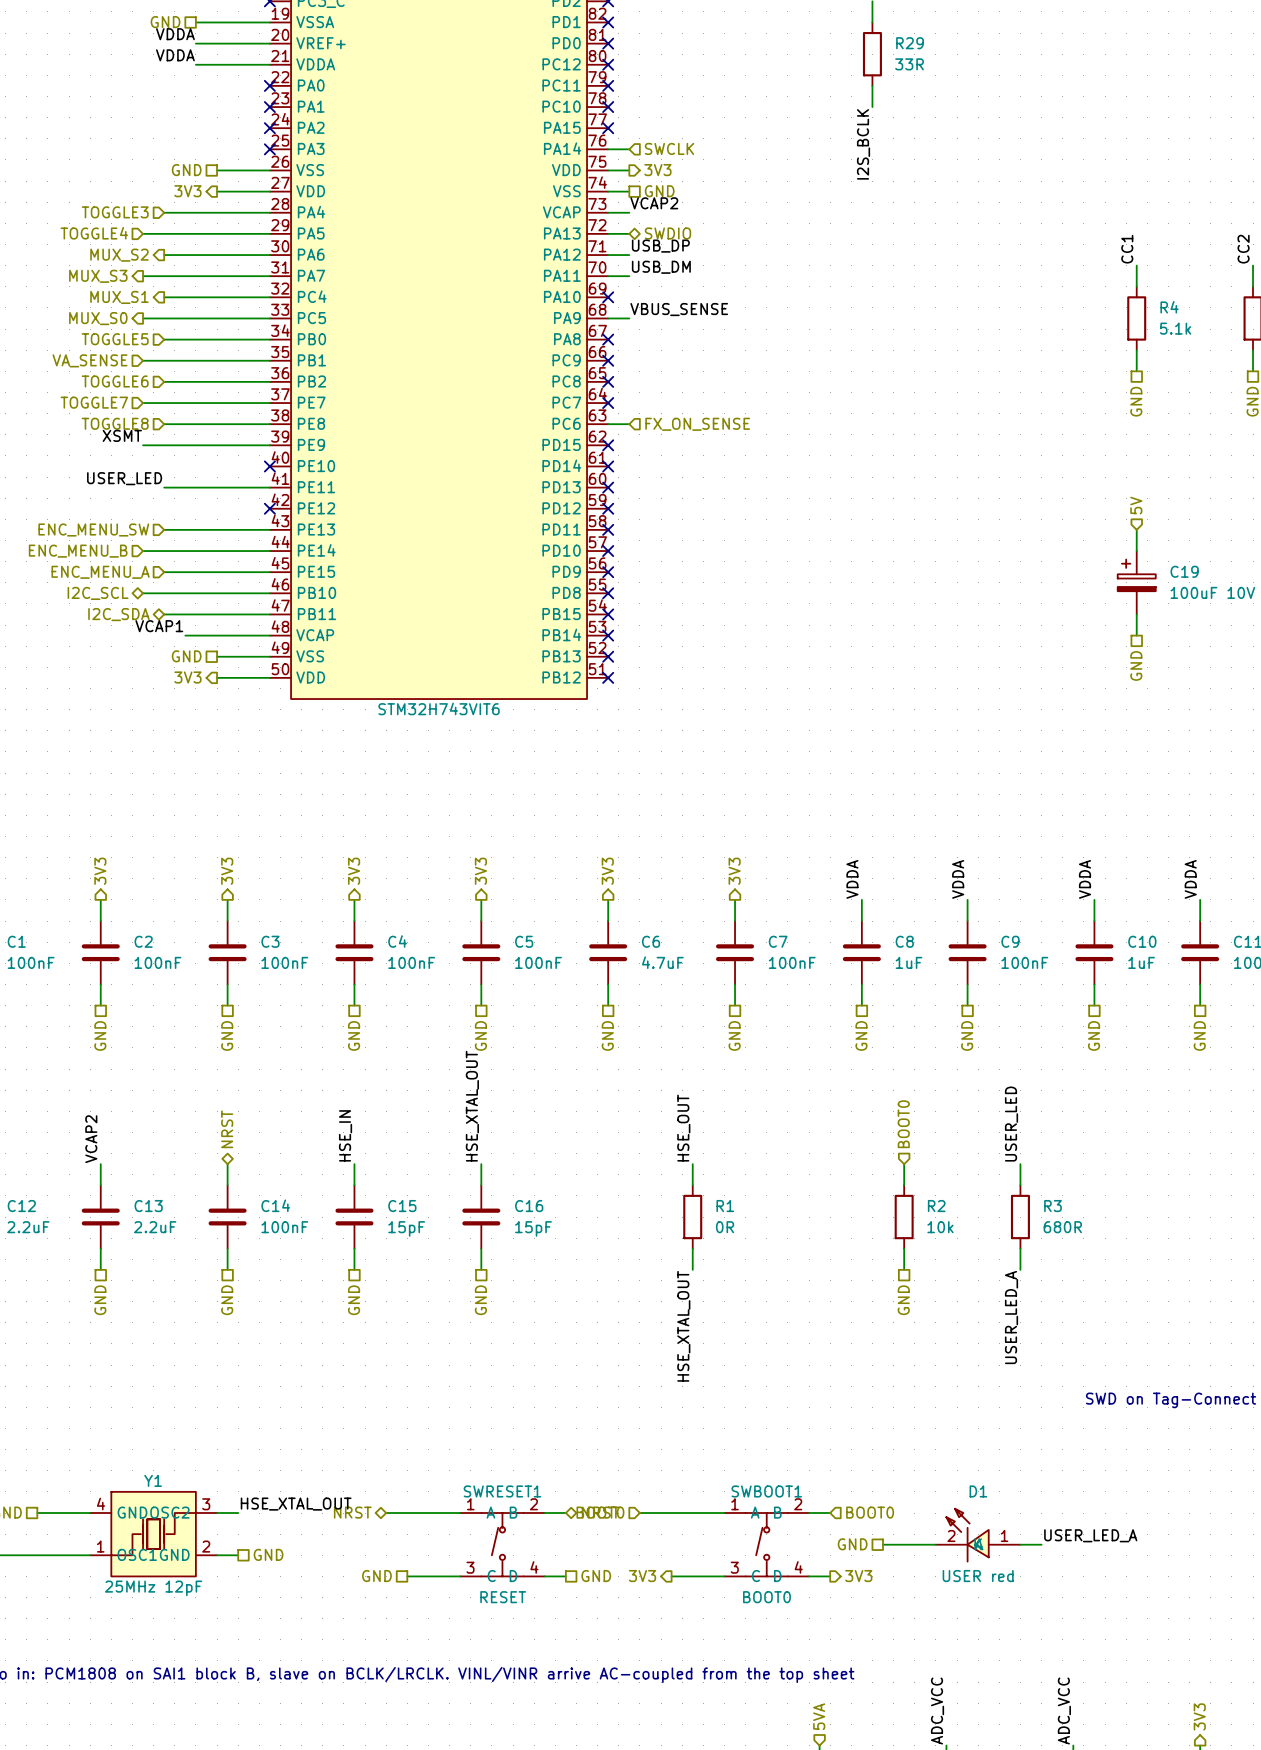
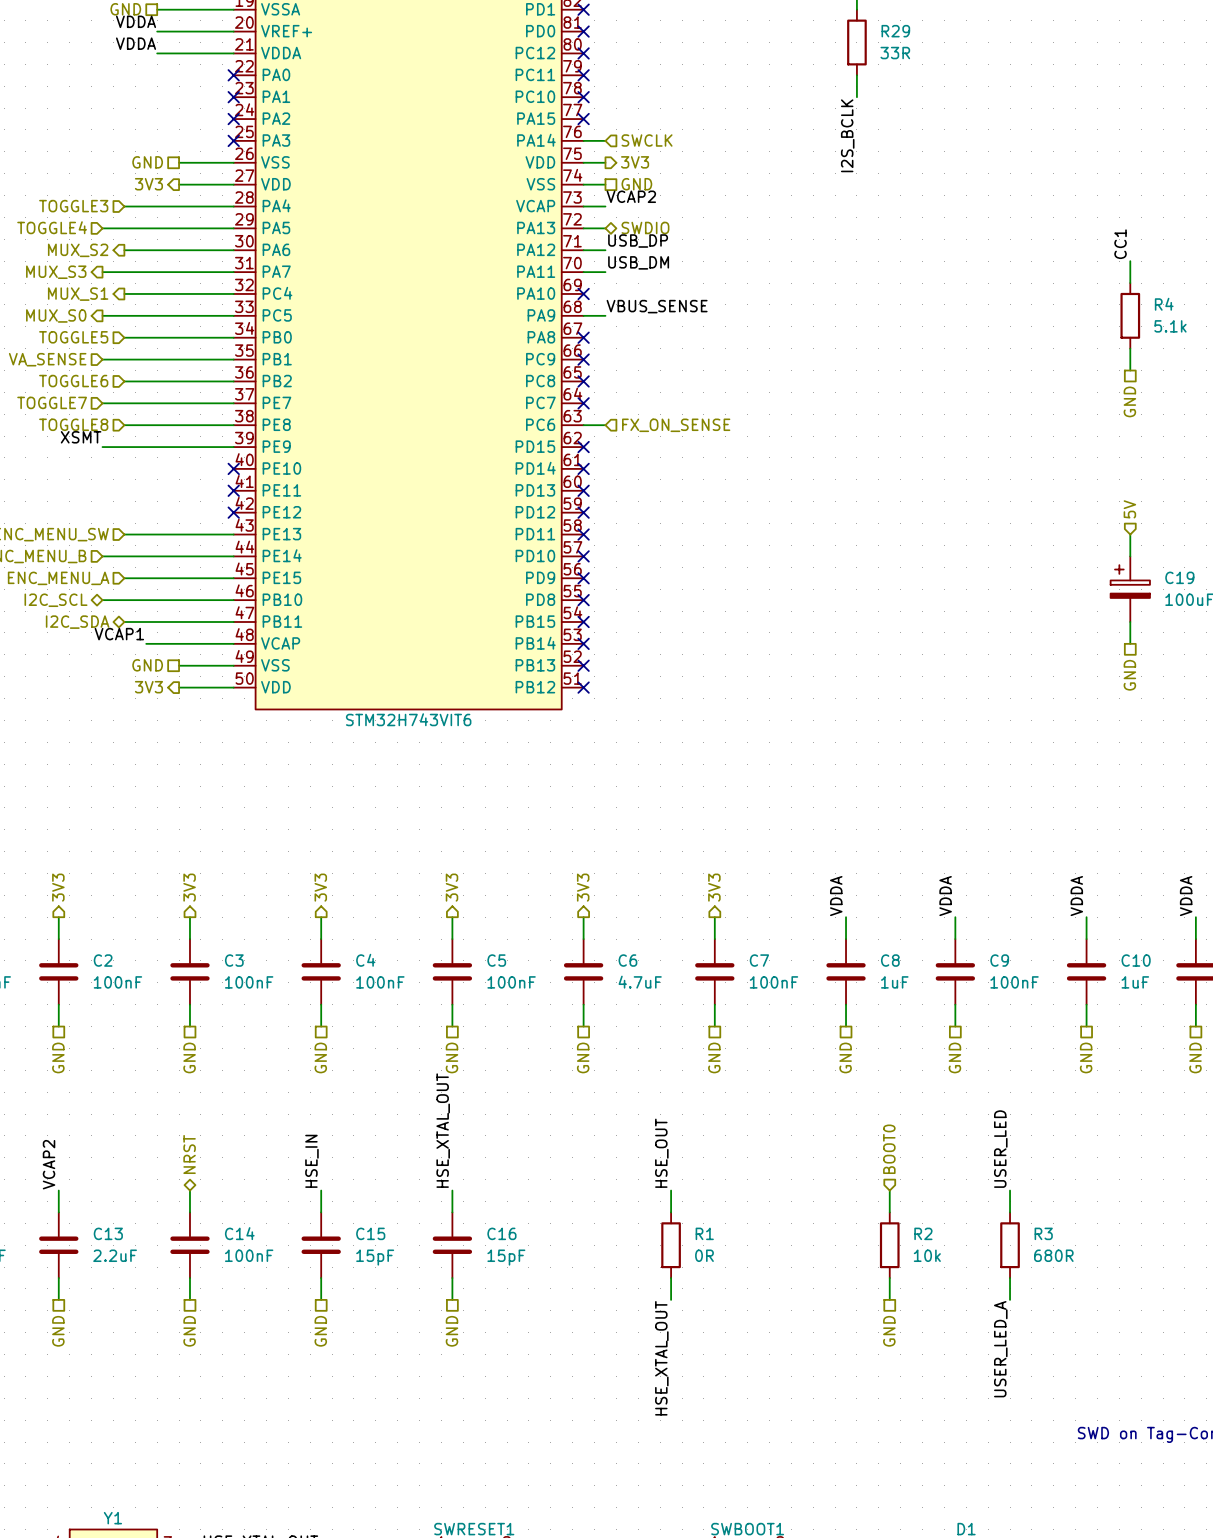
label: USER_LED (124, 478) -> none
wire: (164, 487) (269, 487) -> none
no-connect mark: none -> (233, 490)

